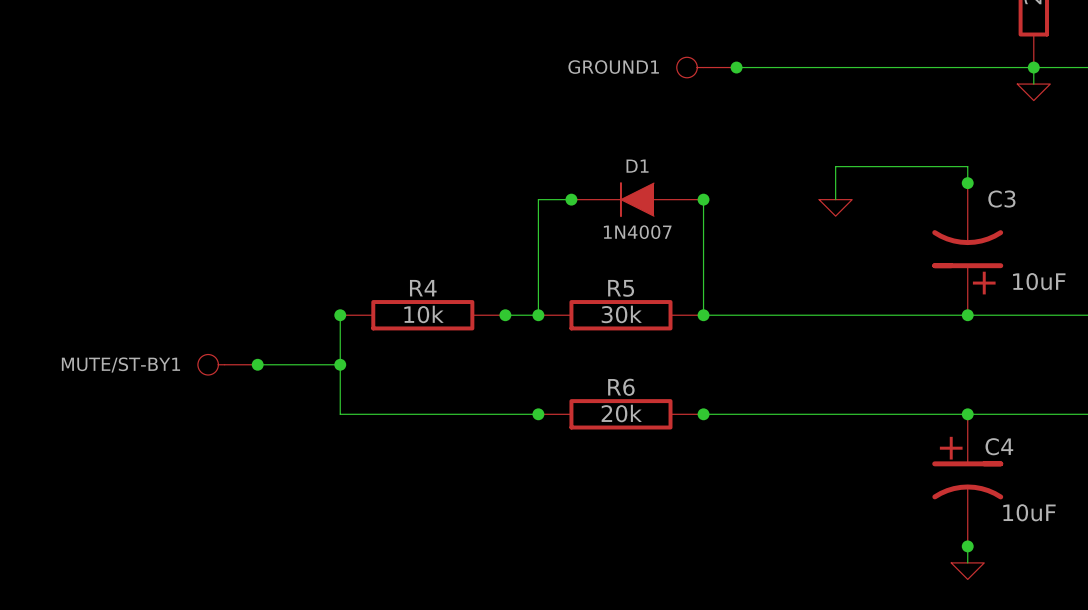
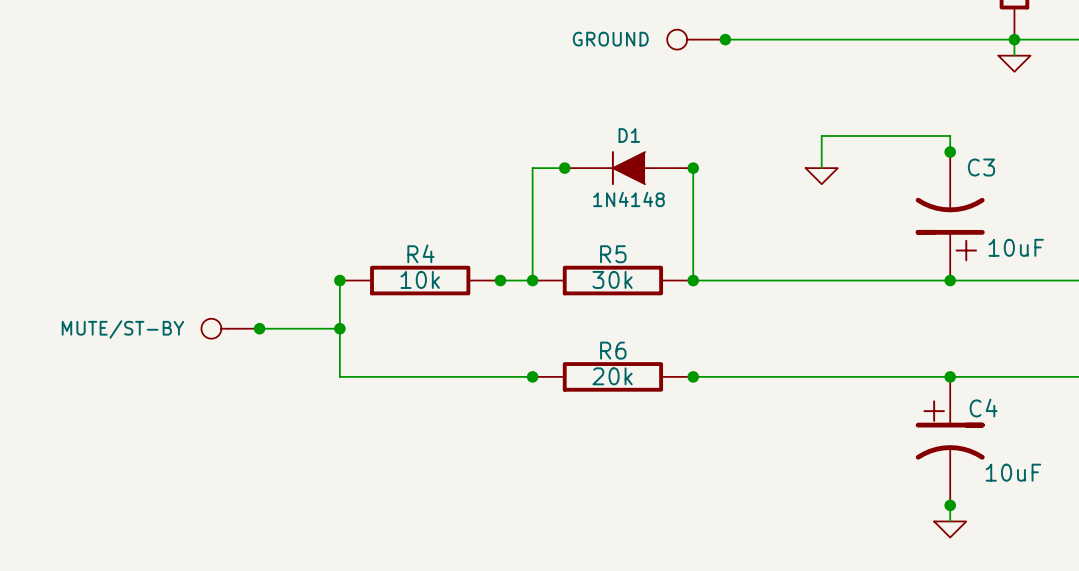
GROUND1 name: GROUND1 (613, 67) -> GROUND (610, 39)
D1 value: 1N4007 (637, 232) -> 1N4148 (628, 199)
MUTE/ST-BY1 name: MUTE/ST-BY1 (120, 364) -> MUTE/ST-BY (122, 329)

